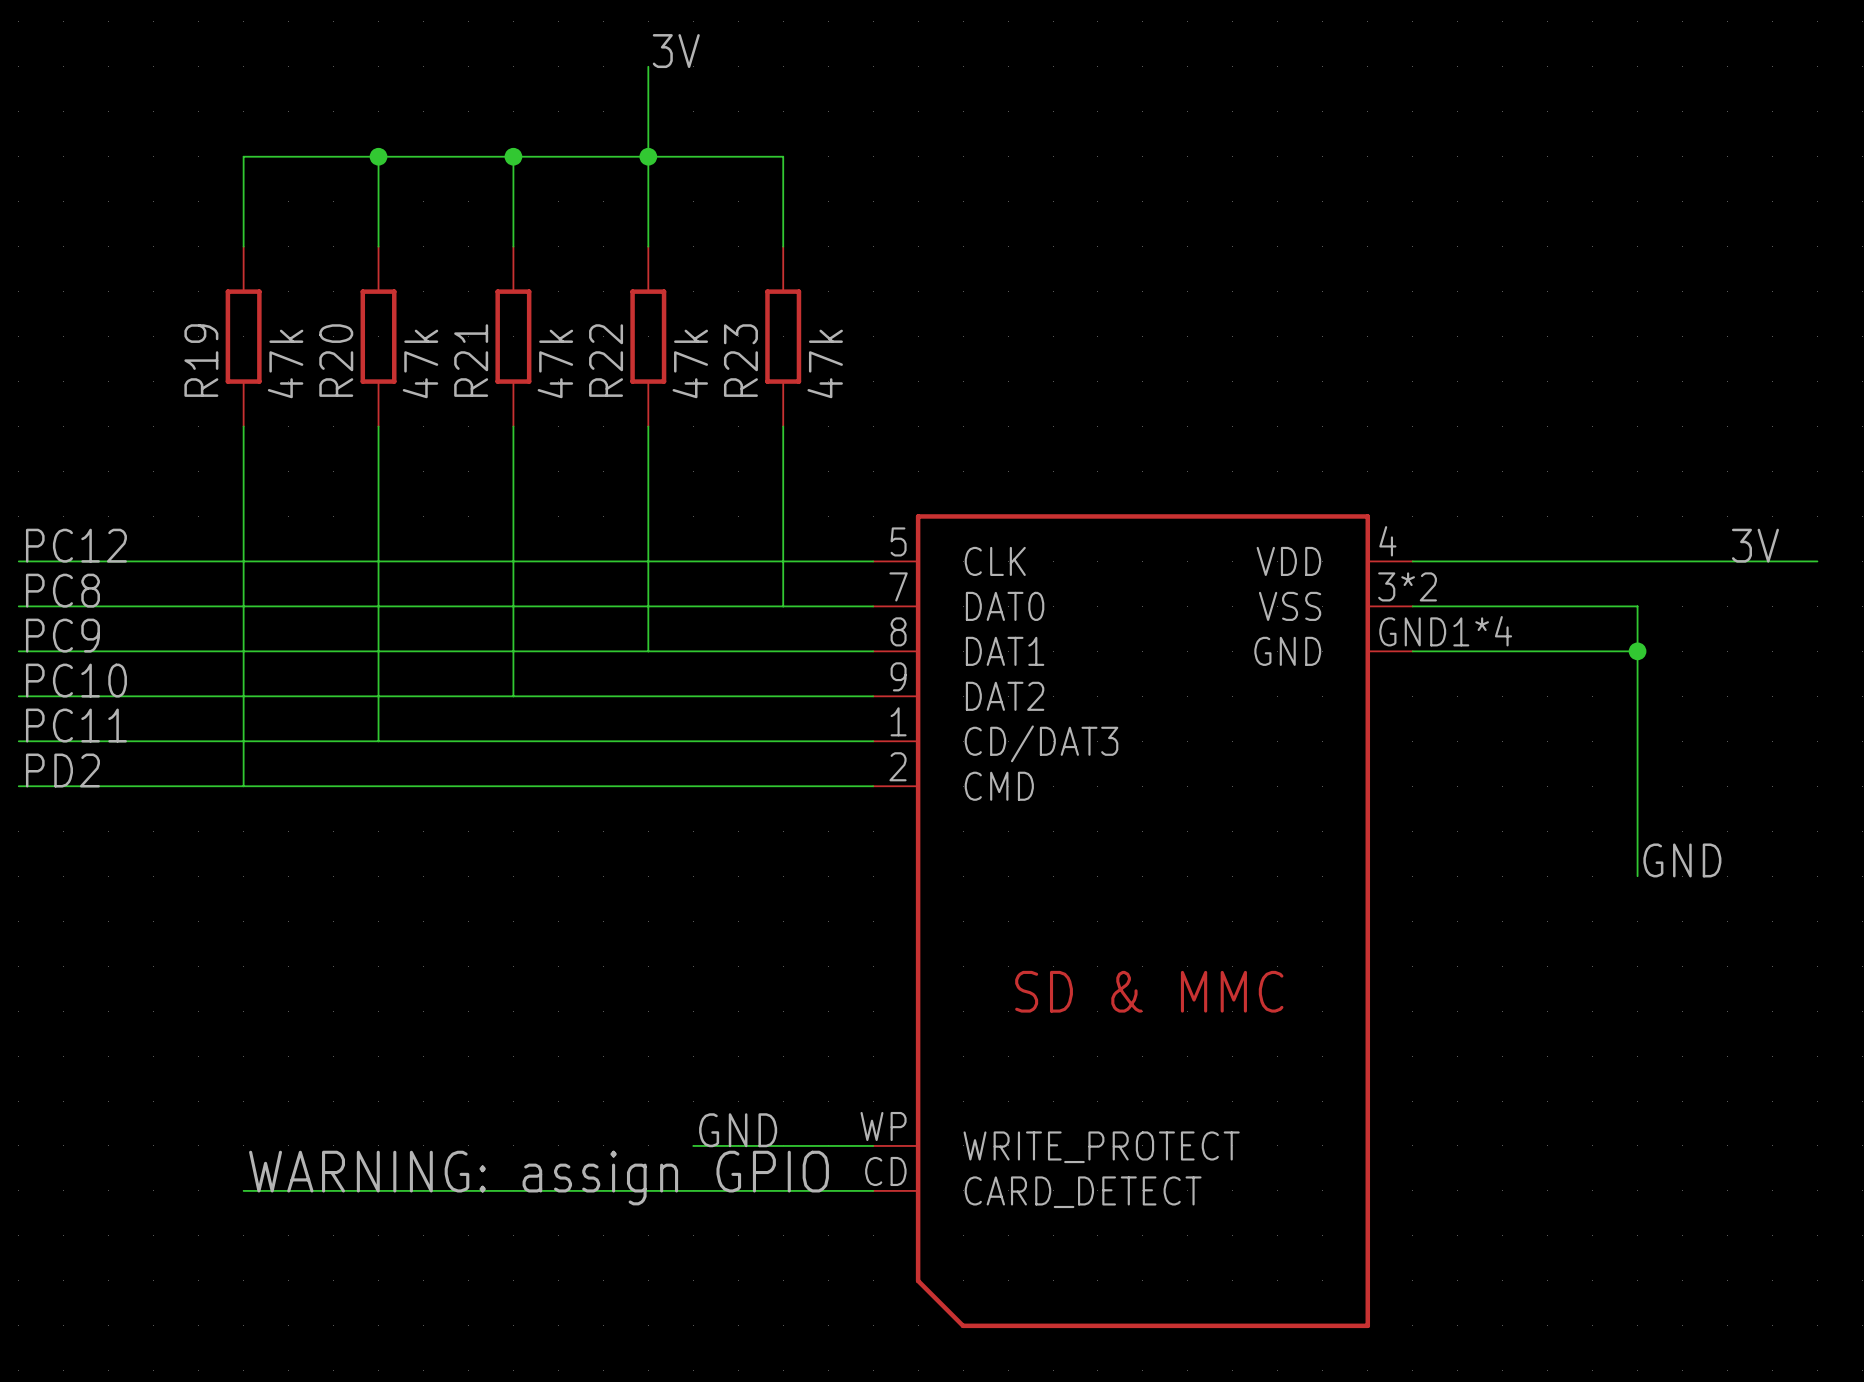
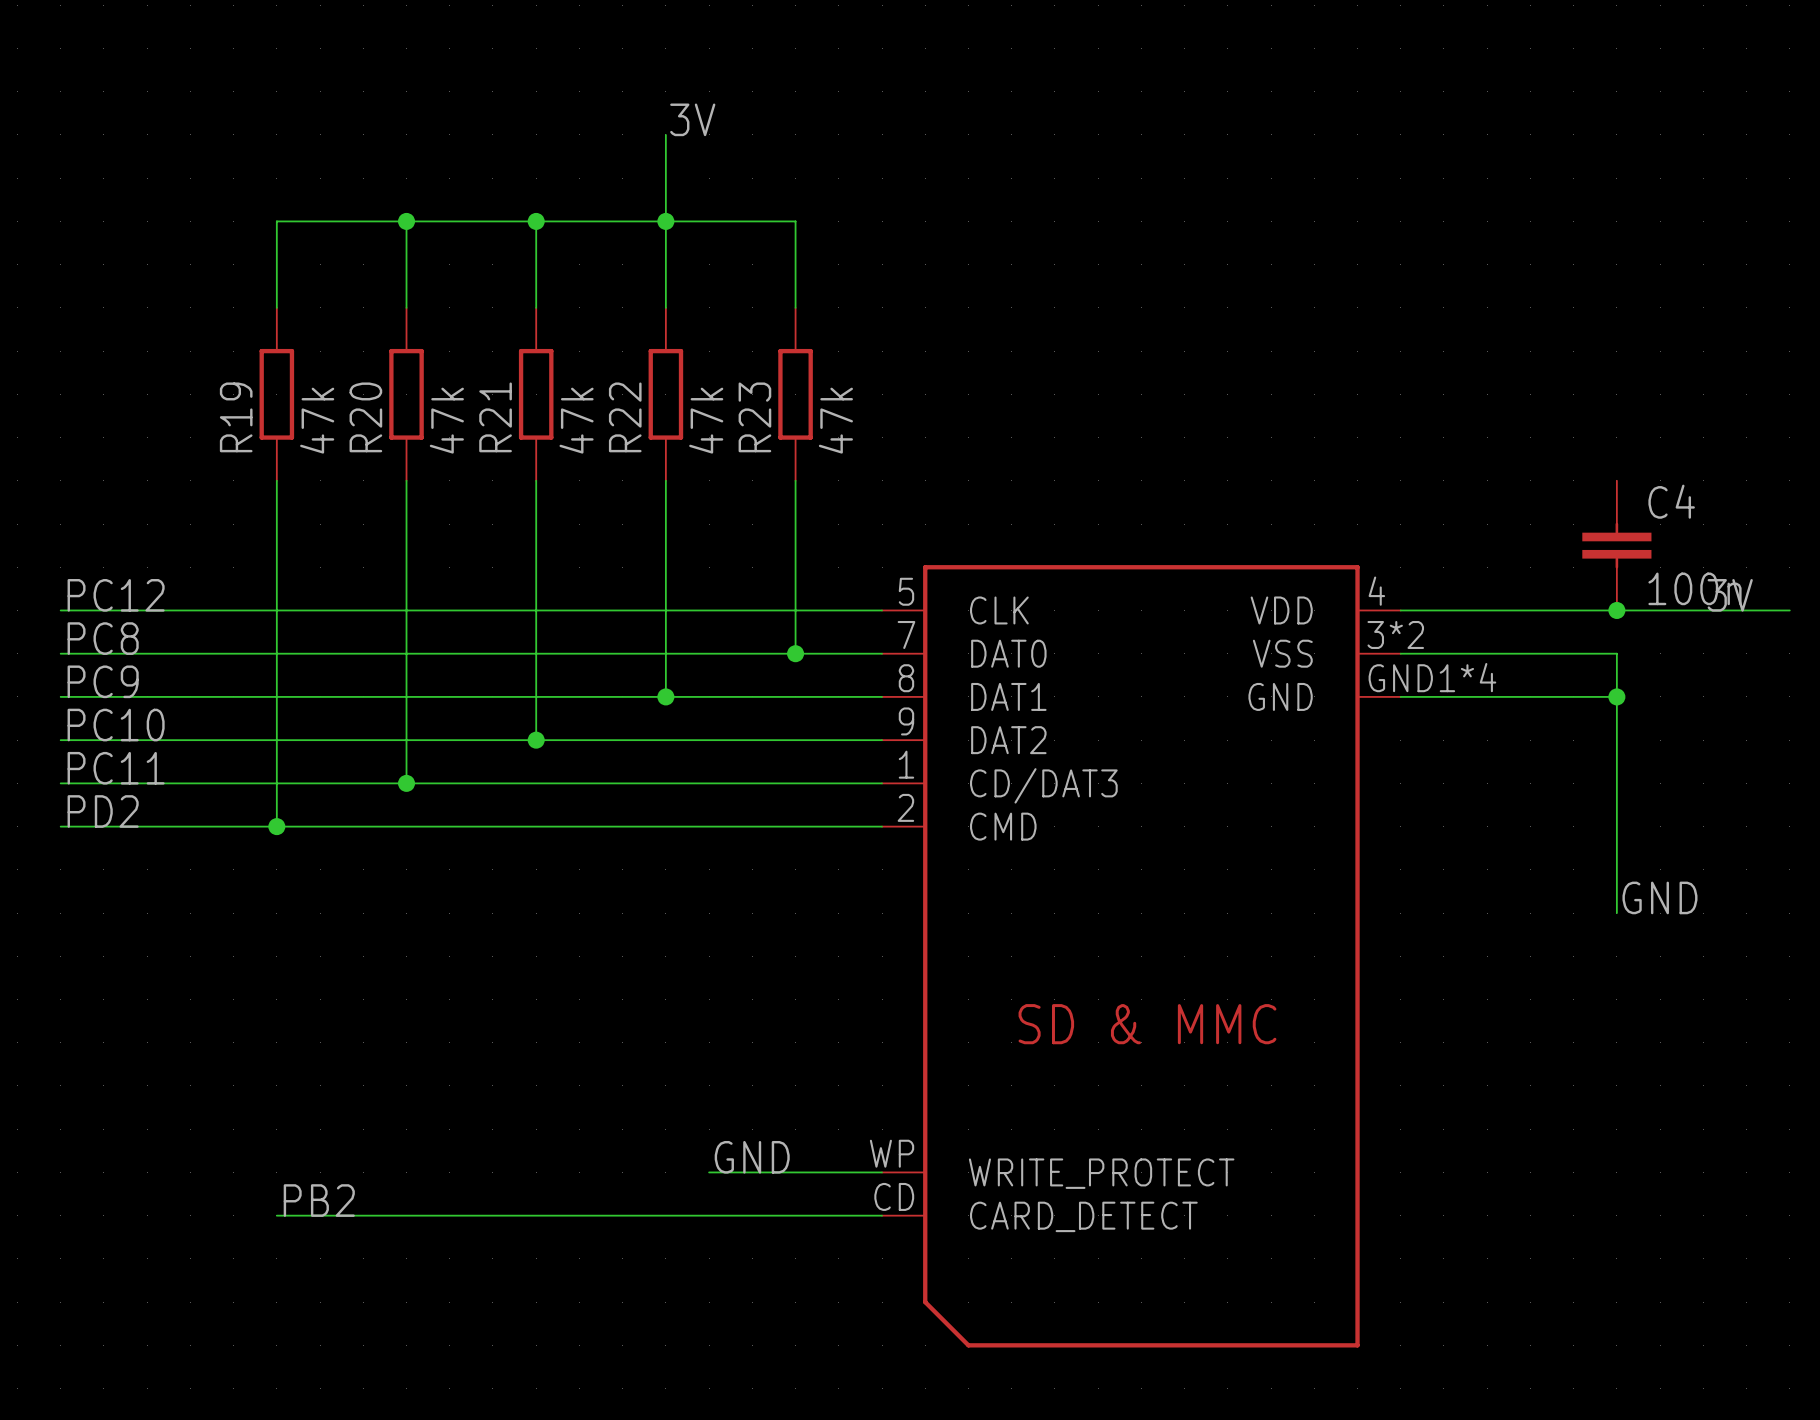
C4: none -> 100n (1616, 545)
junction: none -> (1616, 610)
junction: none -> (795, 653)
junction: none -> (665, 696)
junction: none -> (536, 740)
junction: none -> (406, 783)
junction: none -> (276, 826)
label: none -> PB2 (319, 1200)
text: WARNING: assign GPIO (539, 1178) -> none

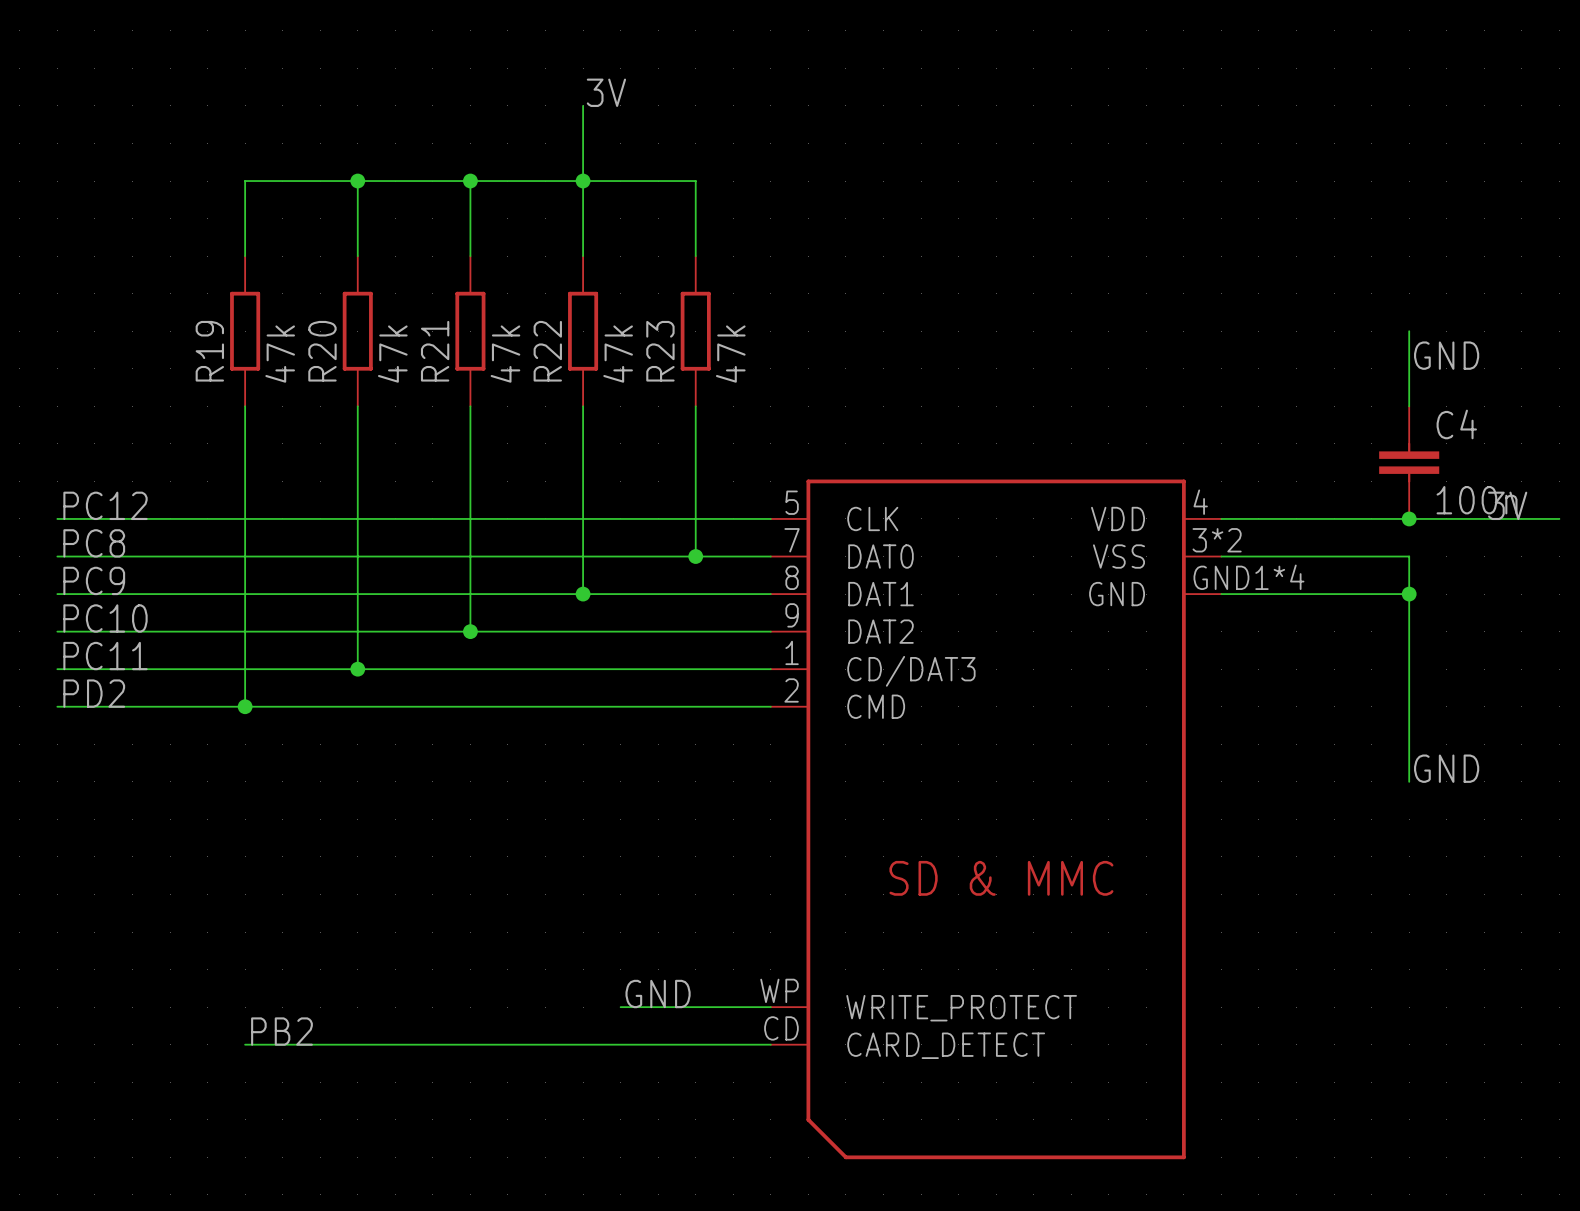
wire: none -> (1409, 331) (1409, 406)
label: none -> GND (1446, 355)

